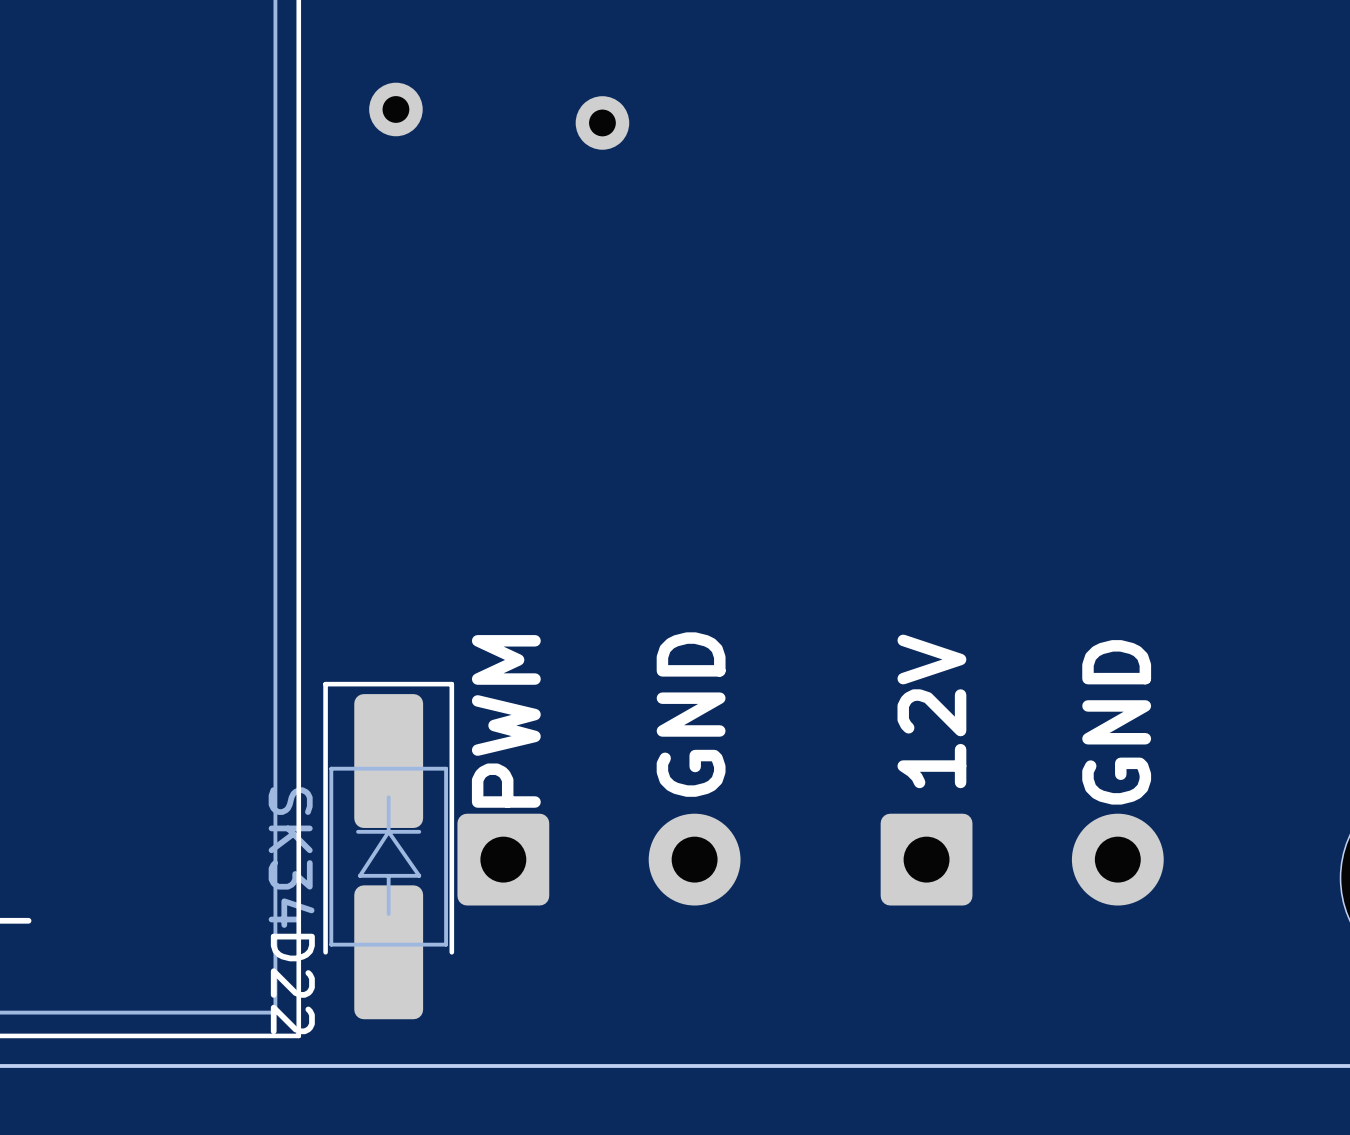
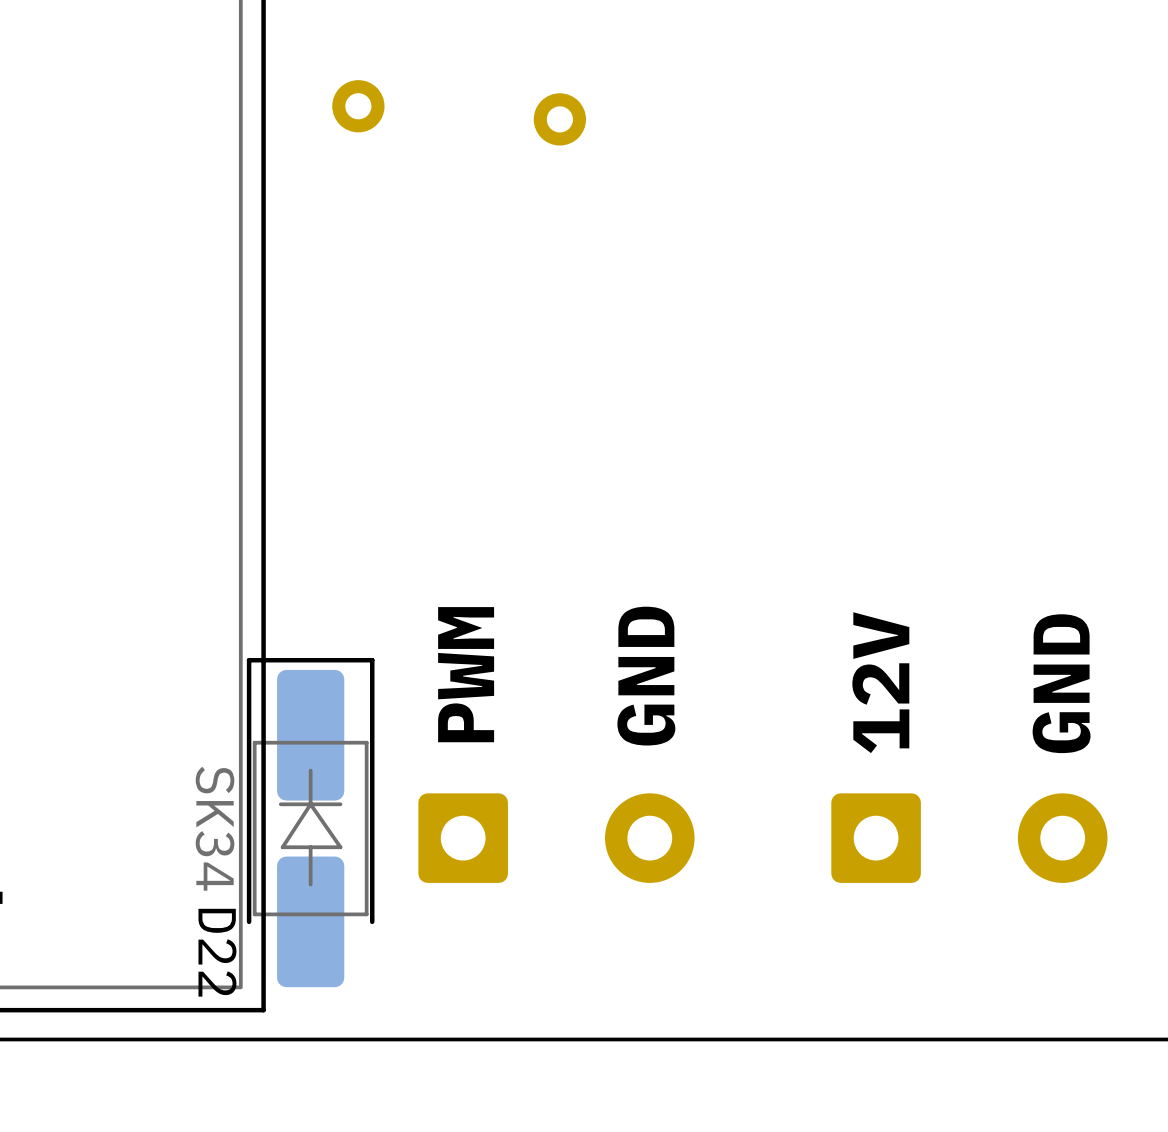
D22 position: (388, 850) -> (310, 822)

